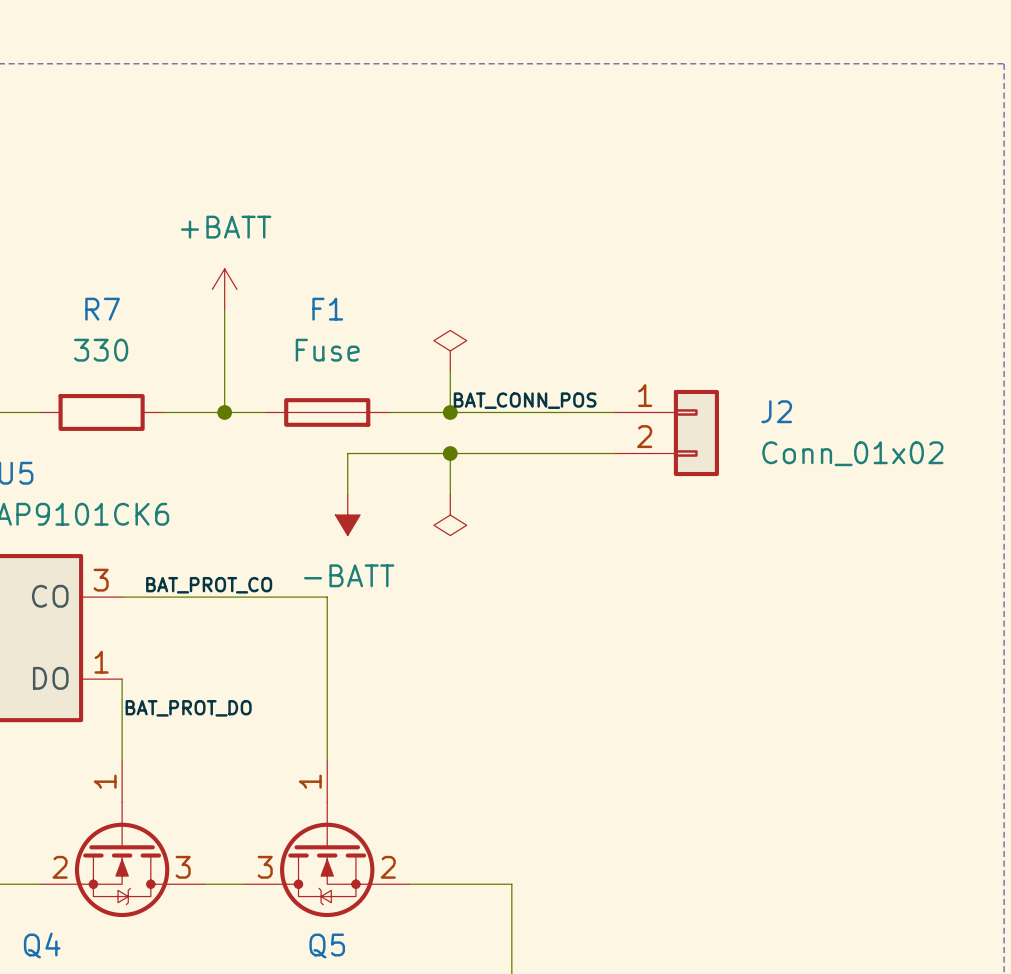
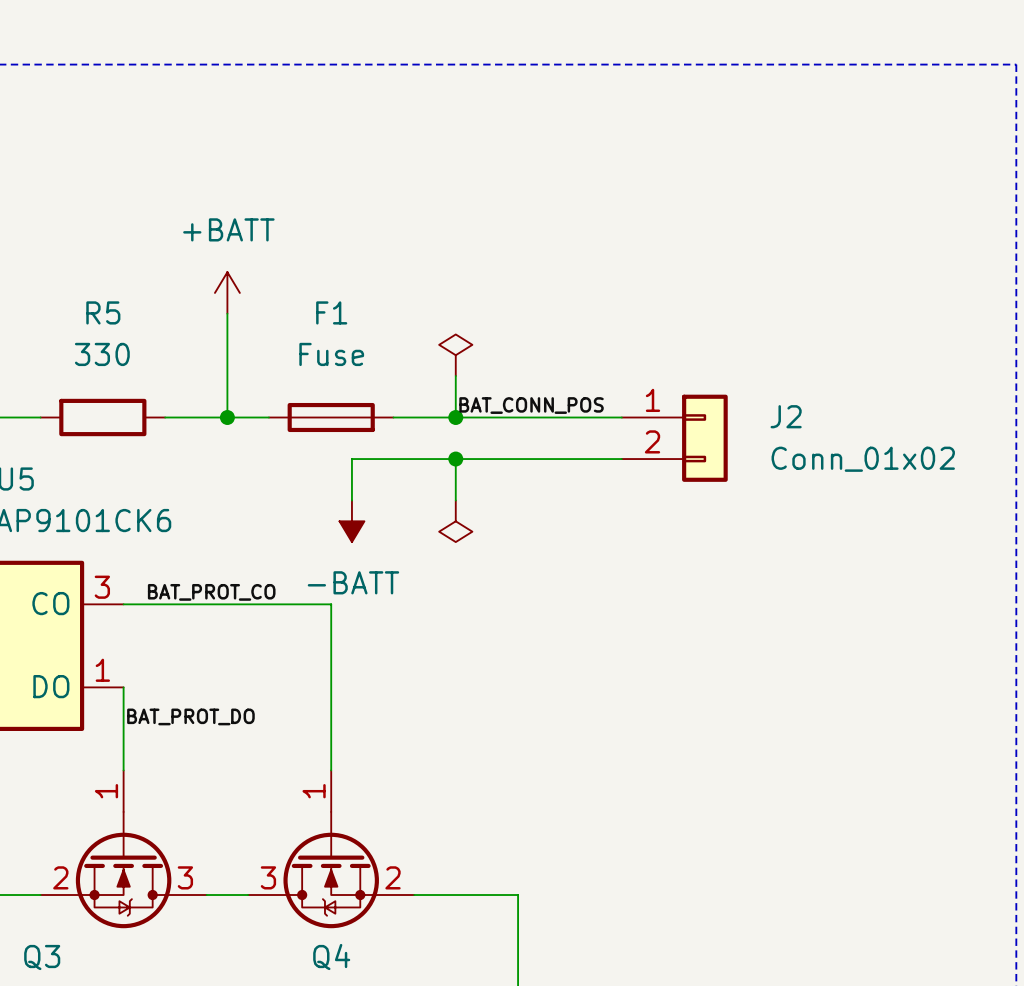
R7 name: R7 (102, 309) -> R5 (103, 312)
Q4 name: Q4 (42, 945) -> Q3 (42, 957)
Q5 name: Q5 (327, 945) -> Q4 (331, 957)

